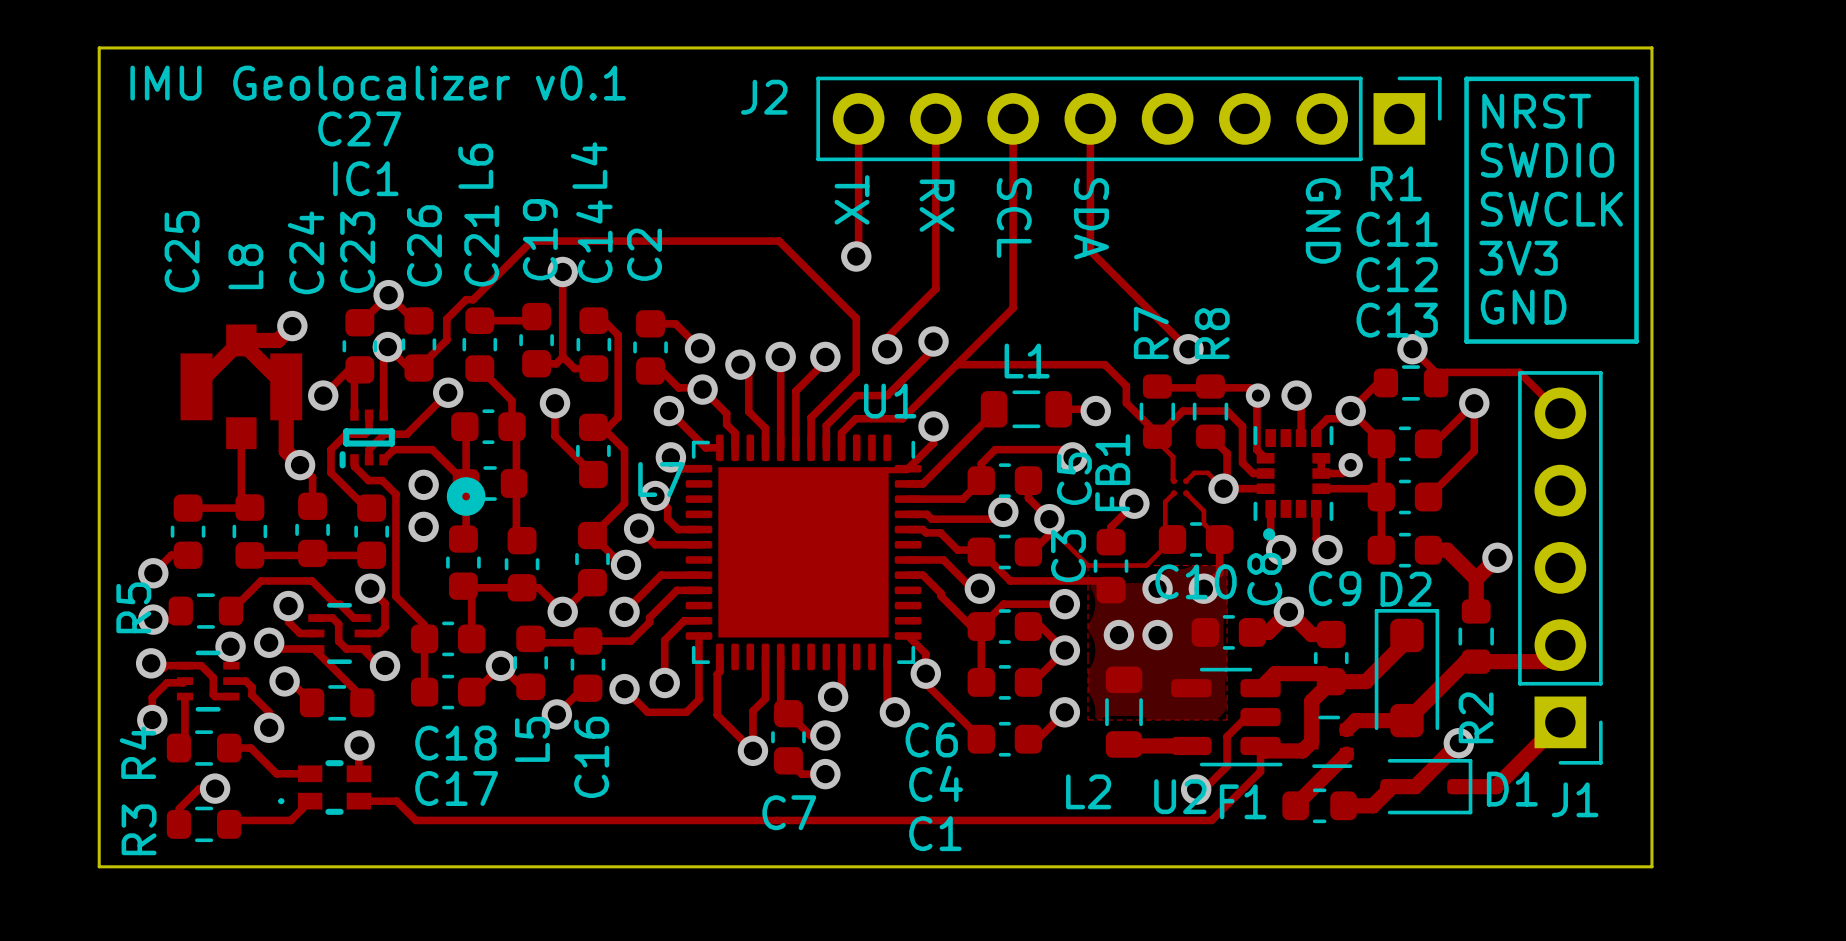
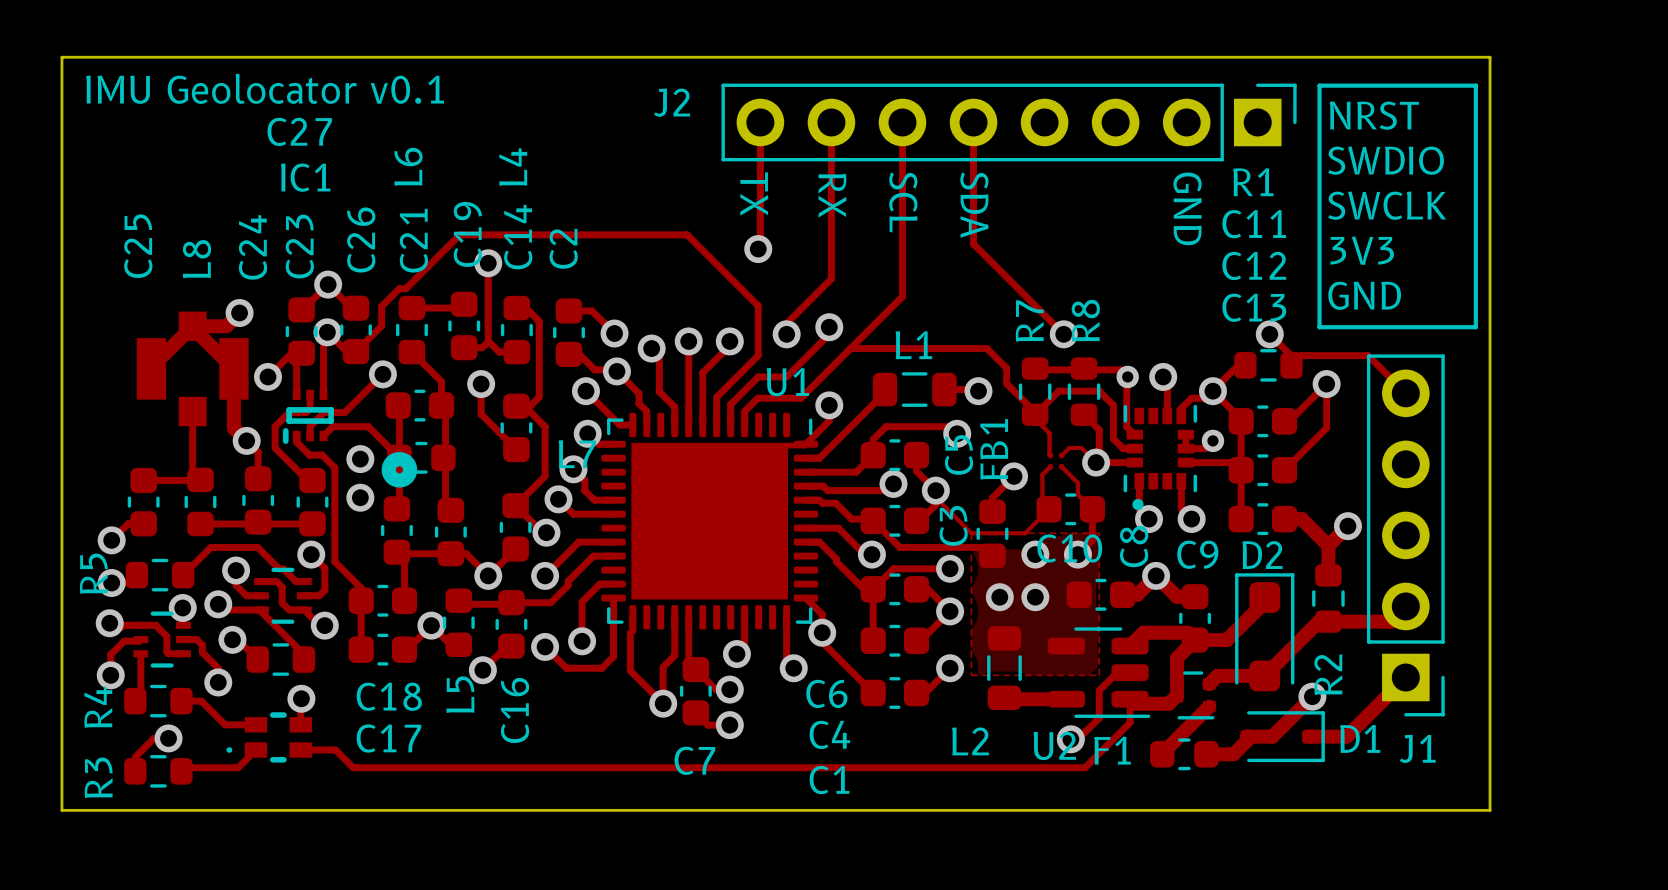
text: IMU Geolocalizer v0.1 (378, 83) -> IMU Geolocator v0.1 (265, 88)

